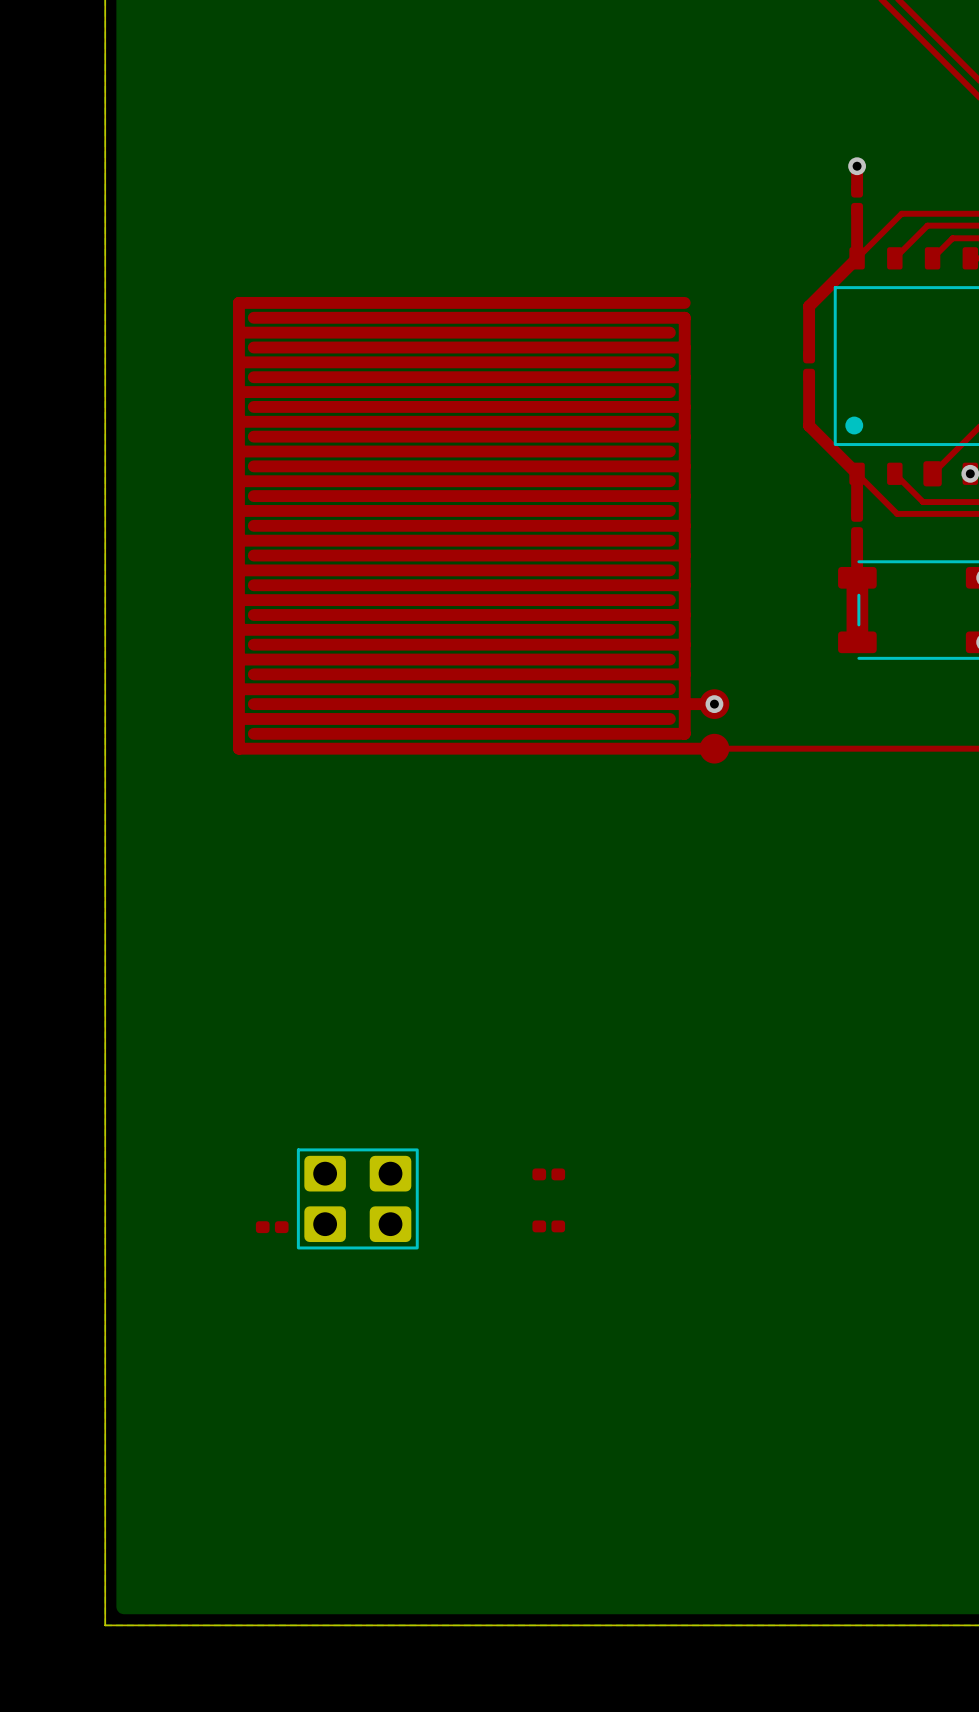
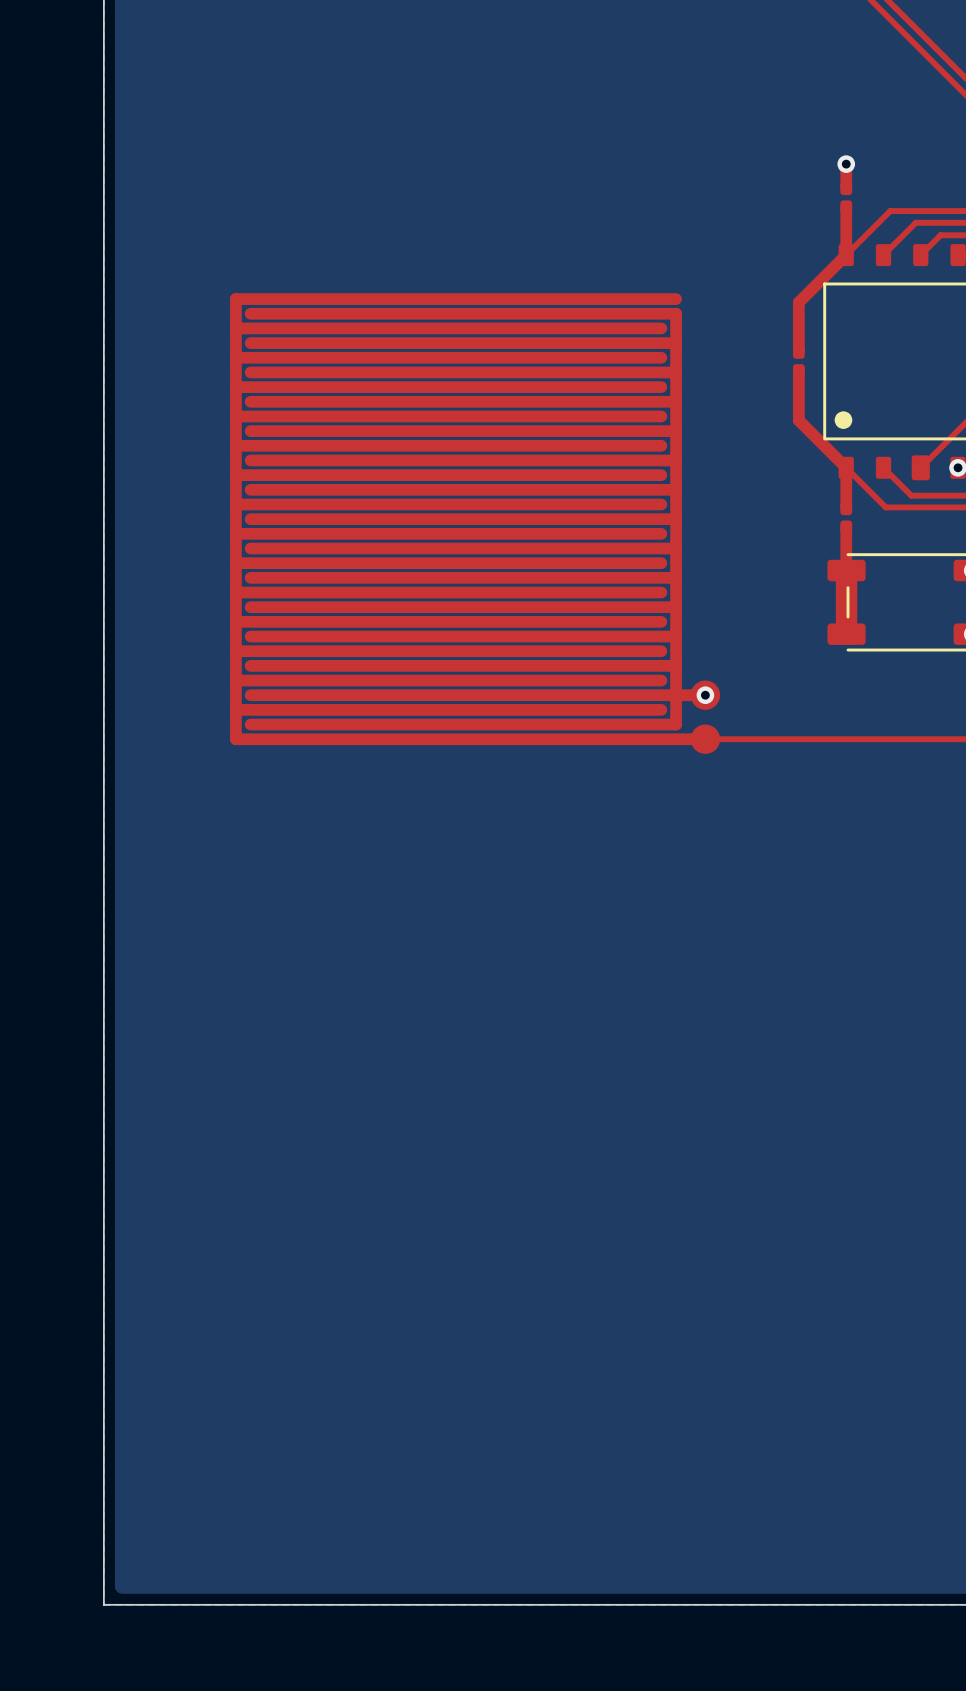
part: (548, 1174) -> none
part: (357, 1198) -> none
part: (548, 1226) -> none
part: (272, 1227) -> none

